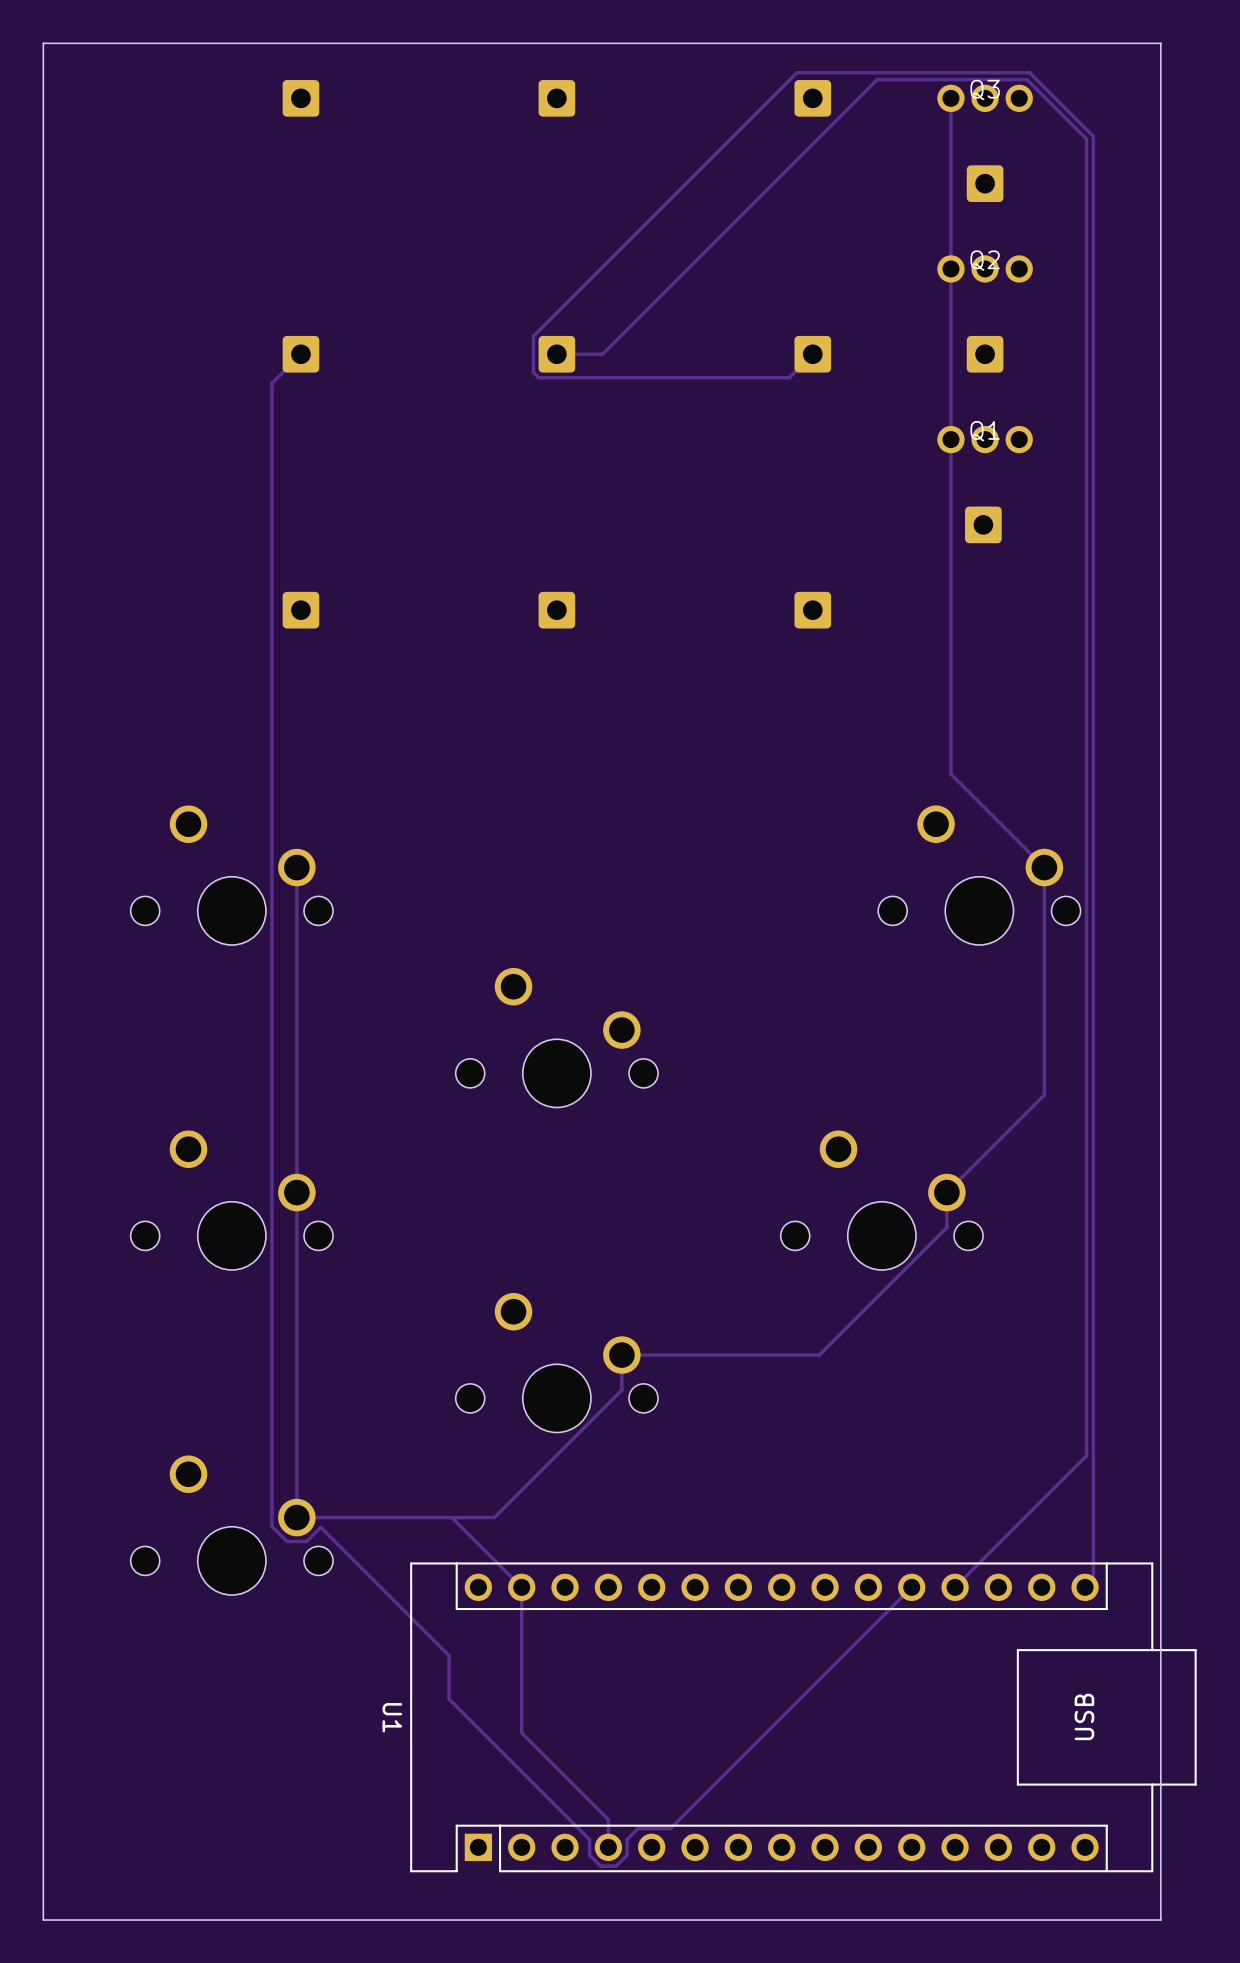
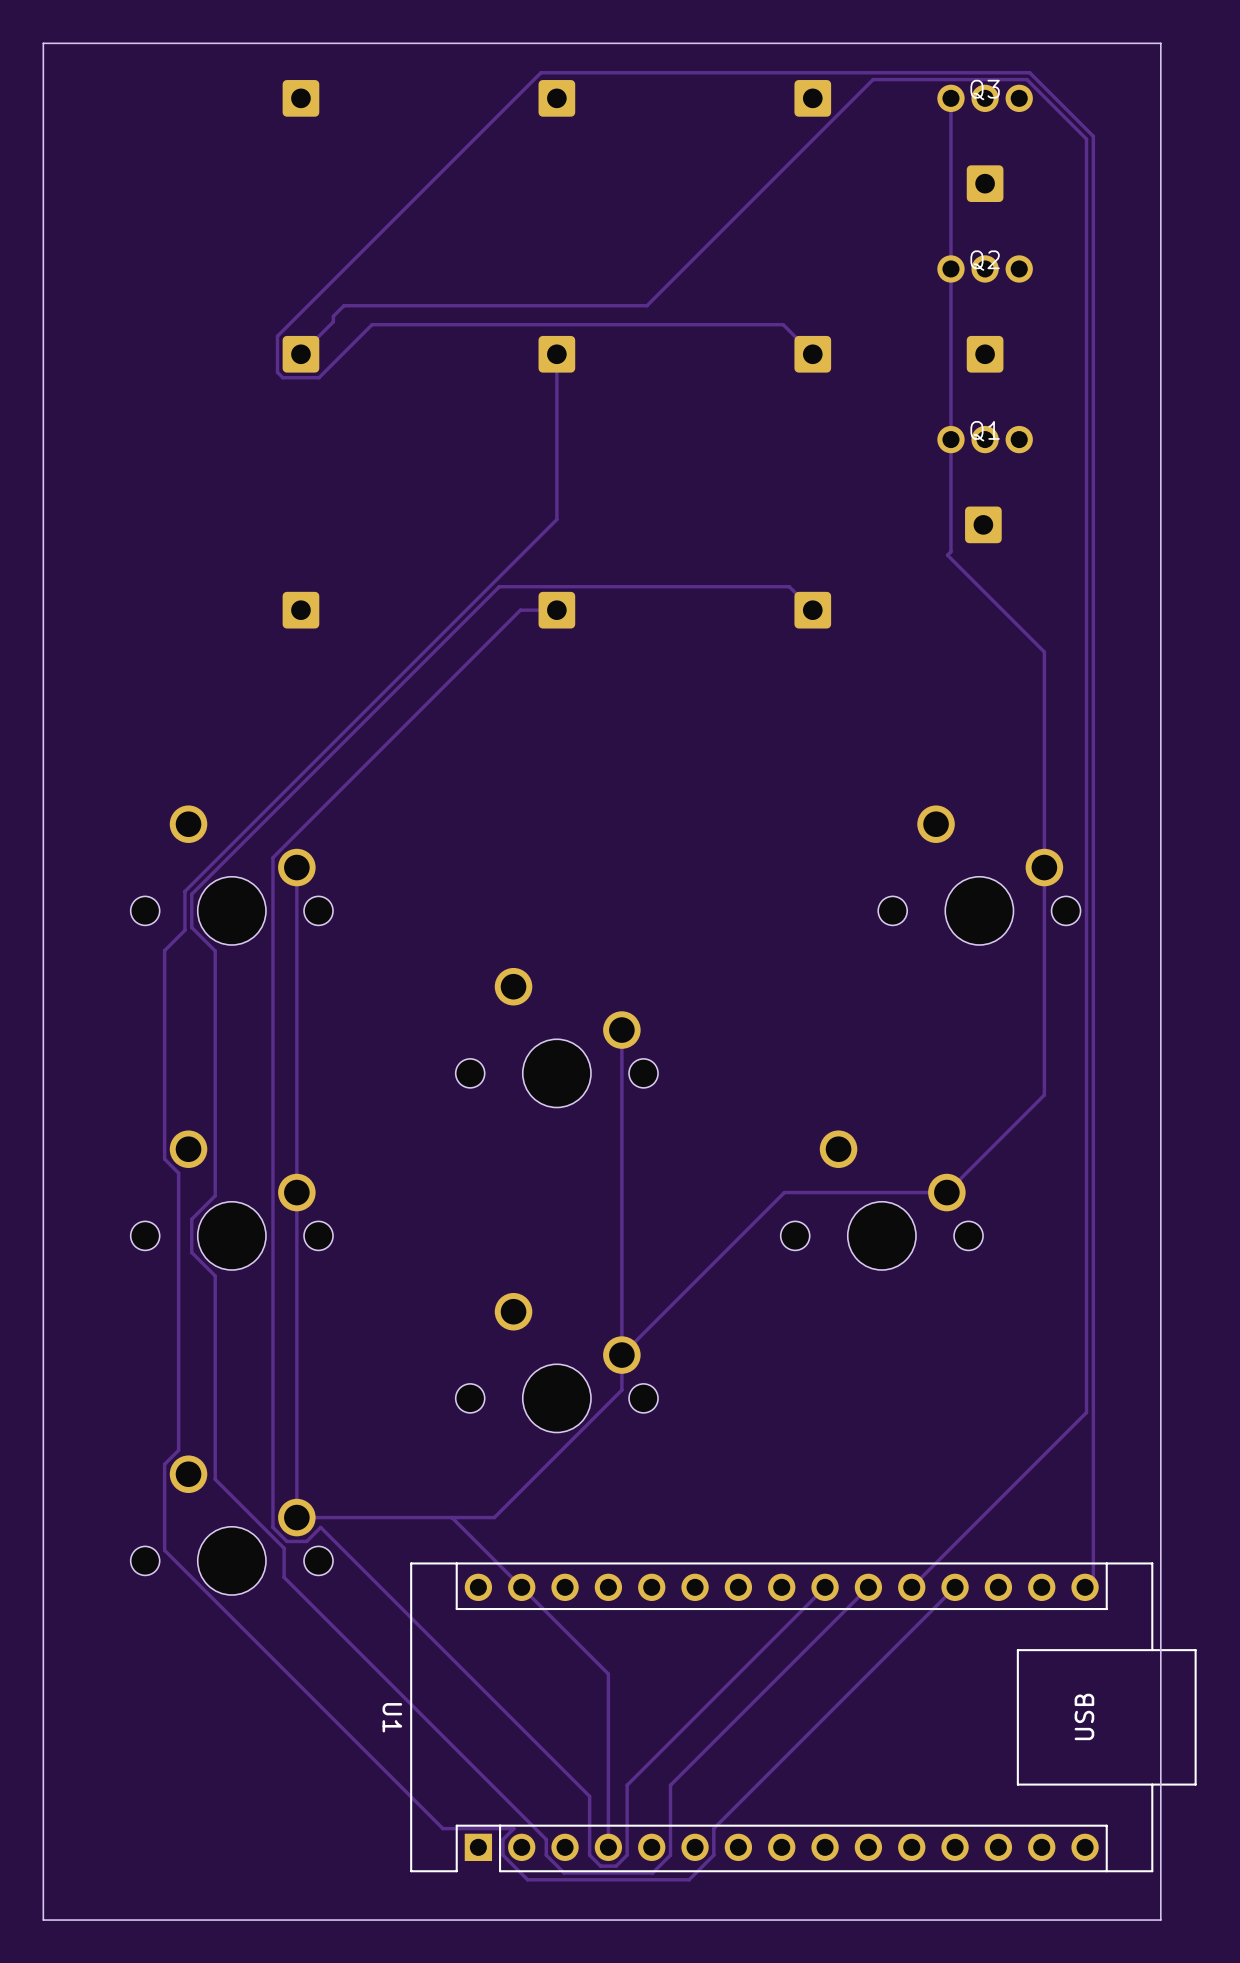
track: (796, 72) (533, 336) (533, 372) (538, 377) (789, 377) (812, 354) -> (796, 72) (540, 72) (277, 336) (277, 372) (282, 377) (319, 377) (372, 324) (783, 324) (812, 354)
track: (877, 79) (602, 354) (556, 354) -> (877, 79) (873, 79) (646, 305) (343, 305) (333, 316) (333, 321) (300, 354)
track: (300, 354) (271, 383) (272, 1527) -> (556, 610) (520, 610) (272, 857) (272, 1527)
track: none -> (556, 354) (556, 519) (184, 891) (184, 930) (164, 950) (164, 1159) (178, 1173) (178, 1450) (164, 1464) (164, 1550) (442, 1828) (513, 1828) (502, 1839) (502, 1855) (527, 1879) (689, 1879) (713, 1855) (713, 1828) (955, 1587)
track: (950, 551) (950, 774) (1044, 867) -> (950, 551) (947, 555) (1044, 651) (1044, 867)
track: none -> (812, 610) (789, 586) (499, 586) (191, 894) (191, 927) (215, 950) (215, 1195) (191, 1219) (191, 1252) (215, 1275) (215, 1479) (284, 1548) (284, 1577) (546, 1839) (546, 1855) (564, 1872) (652, 1872) (670, 1855) (670, 1785) (868, 1587)
track: (946, 1192) (946, 1227) (819, 1355) (621, 1355) -> (946, 1192) (784, 1192) (621, 1355) (621, 1030)
track: (1086, 1412) (1086, 1455) (955, 1587) -> (1086, 1412) (911, 1587)
track: (521, 1587) (521, 1733) (608, 1819) -> (521, 1587) (608, 1674) (608, 1819)
track: (911, 1587) (670, 1828) (638, 1828) (627, 1839) -> (825, 1587) (627, 1785) (627, 1839)
track: (449, 1655) (449, 1699) (589, 1839) -> (449, 1655) (589, 1796) (589, 1839)

